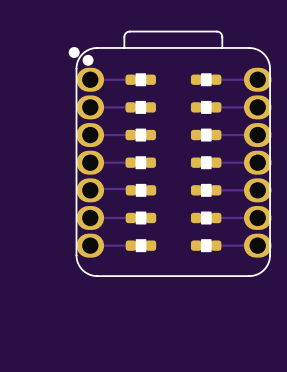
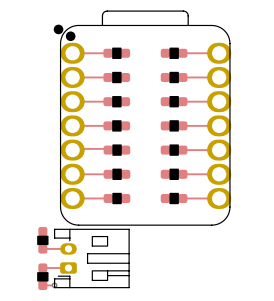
part: none -> (42, 240)
track: none -> (42, 248) (68, 248)
part: none -> (91, 258)
track: none -> (42, 268) (68, 268)
part: none -> (42, 276)
track: none -> (42, 285) (54, 285)
via: none -> (54, 285)

